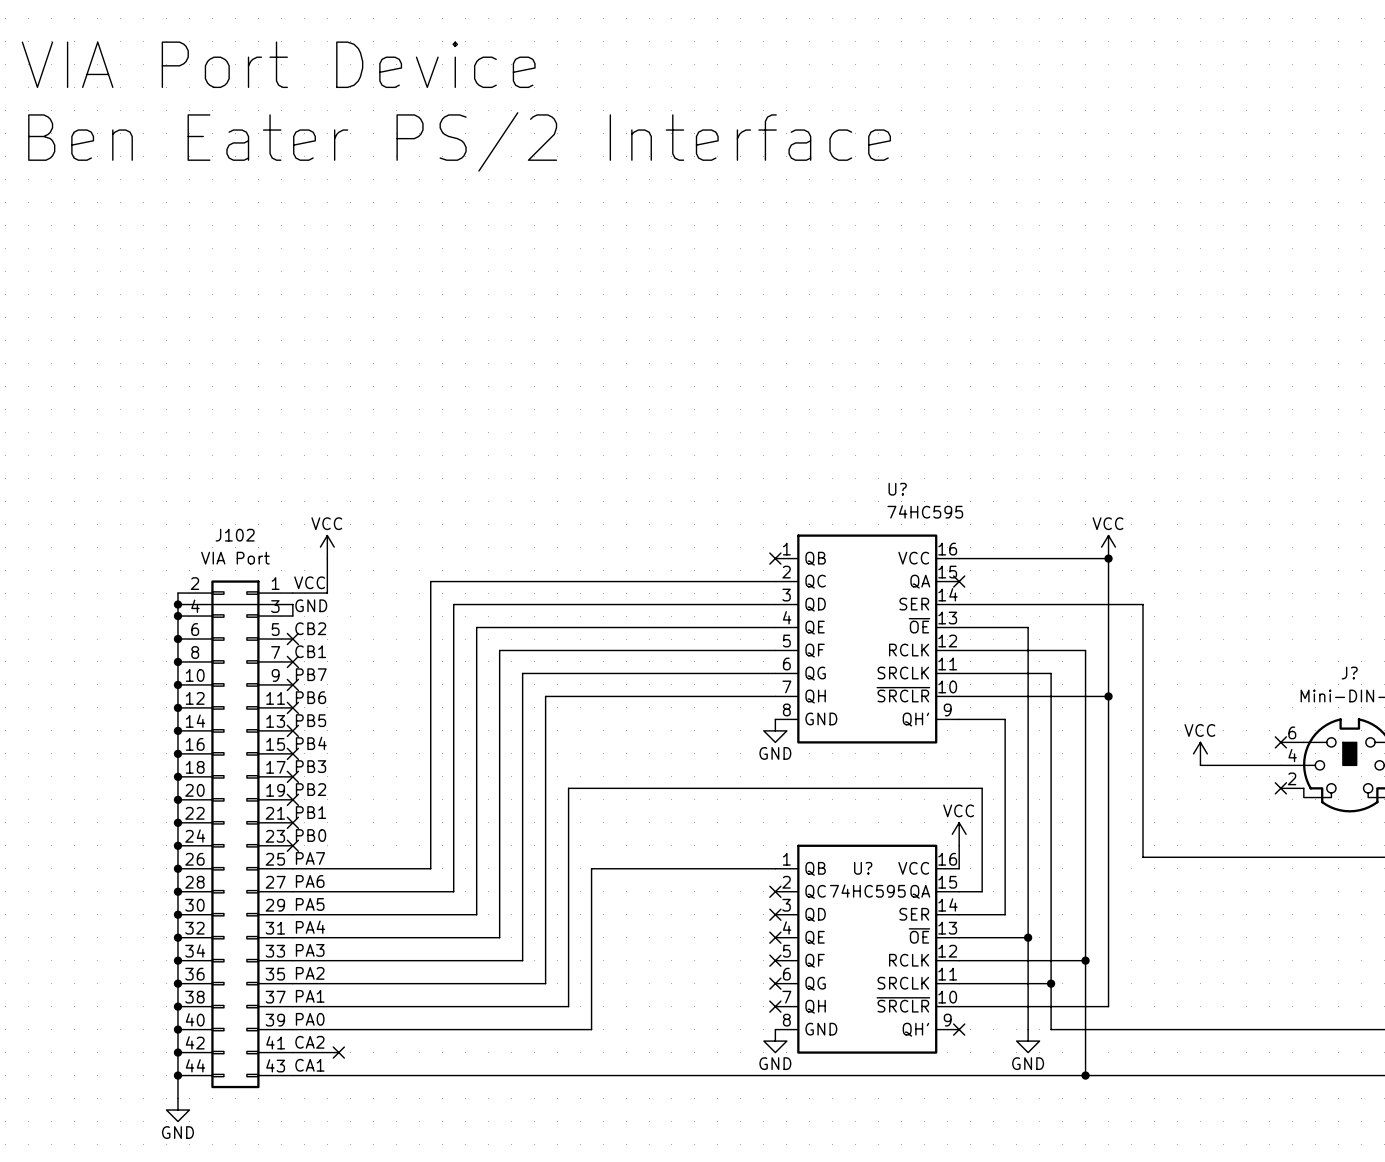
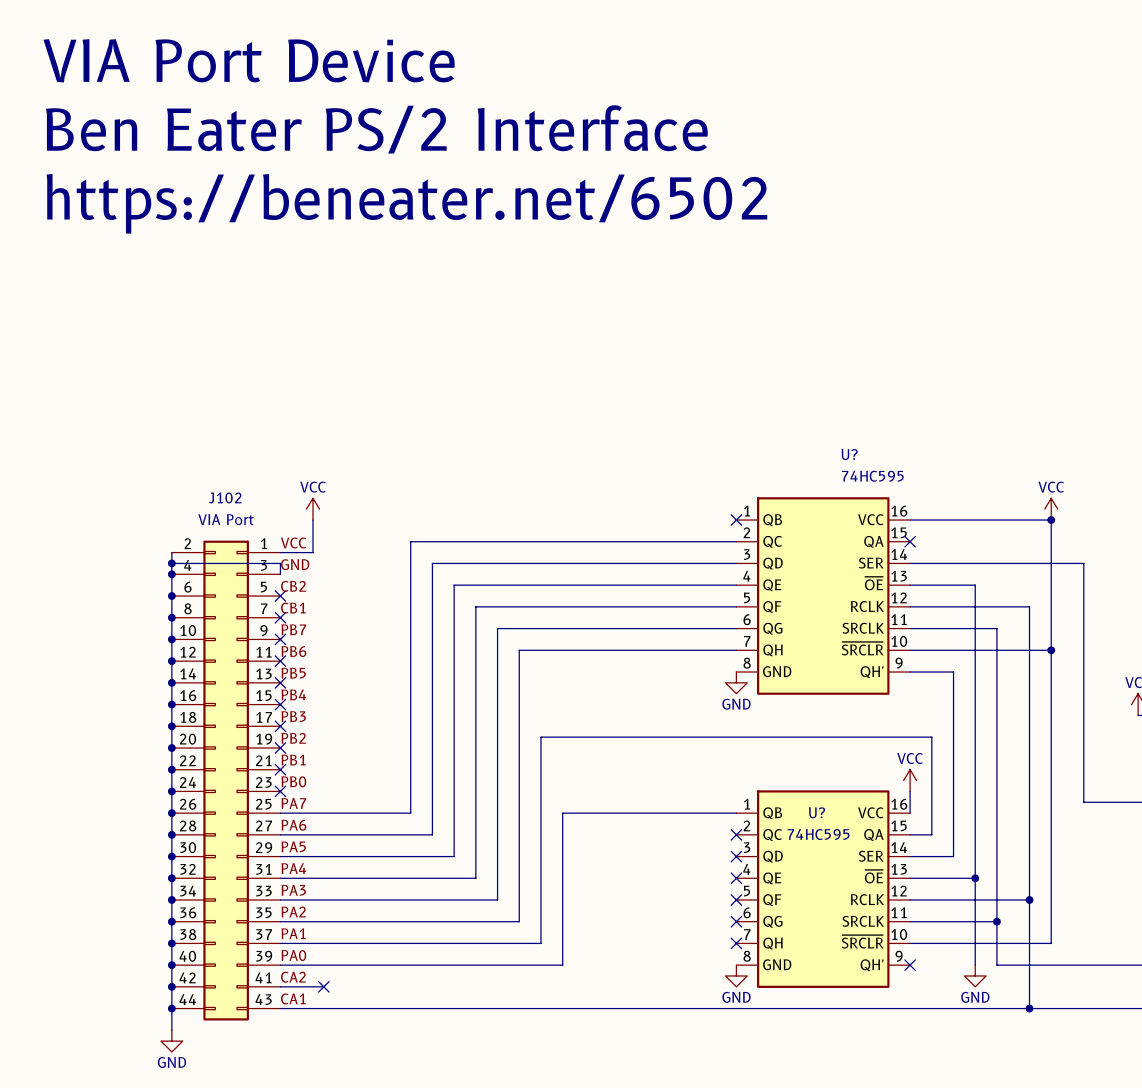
text position: VIA Port Device (278, 64) -> VIA Port Device (249, 60)
text position: Ben Eater PS/2 Interface (459, 141) -> Ben Eater PS/2 Interface (376, 129)
text: none -> https://beneater.net/6502 (406, 203)

